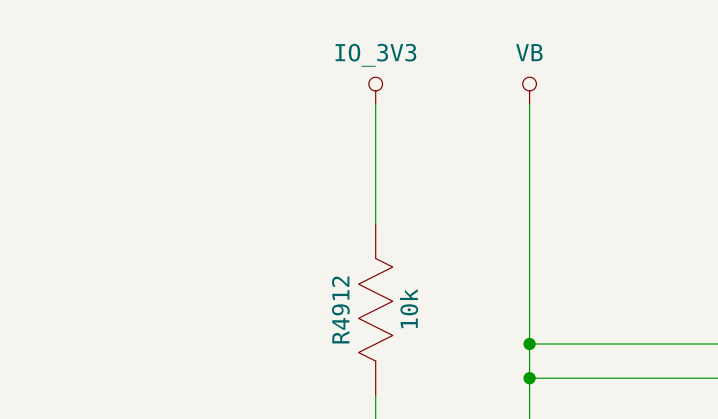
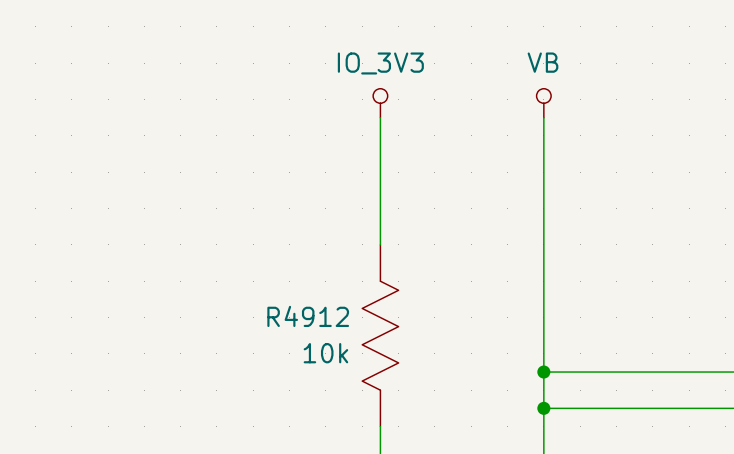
R4912 value rotation: 0° (409, 308) -> 90° clockwise (325, 353)
R4912 value position: 10k (409, 308) -> 10k (325, 353)
R4912 name rotation: 0° (340, 309) -> 90° clockwise (308, 316)

